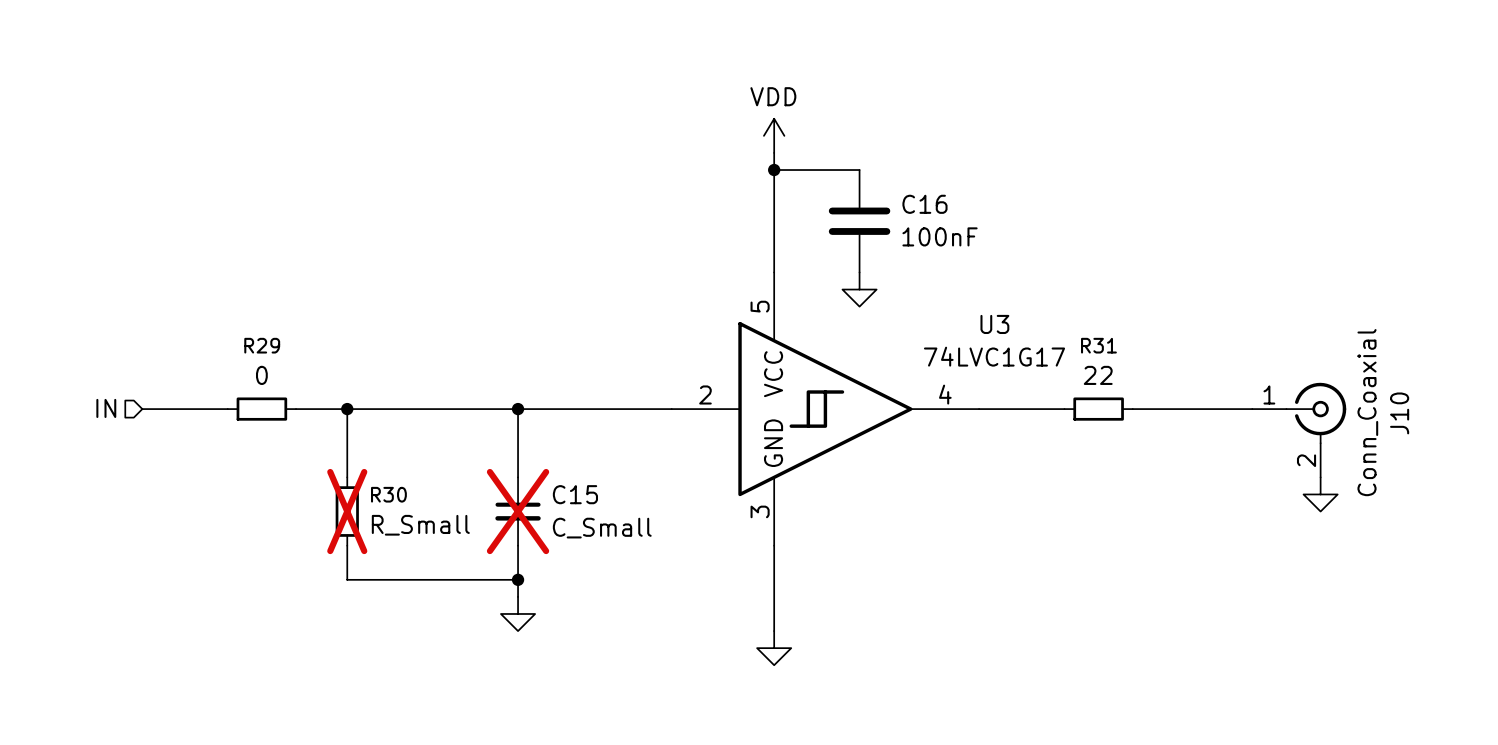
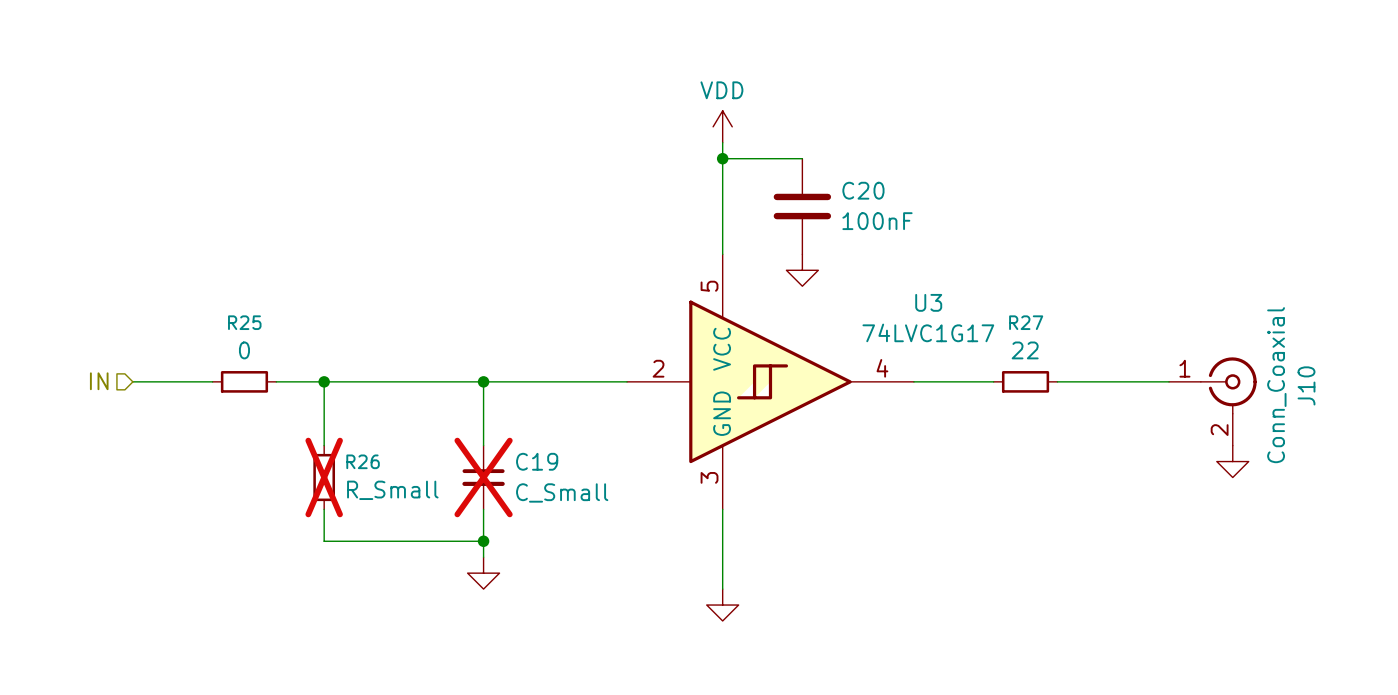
C16 name: C16 (924, 204) -> C20 (863, 190)
R29 name: R29 (262, 345) -> R25 (244, 322)
R31 name: R31 (1098, 345) -> R27 (1026, 322)
R30 name: R30 (388, 494) -> R26 (363, 461)
C15 name: C15 (575, 494) -> C19 (537, 461)

